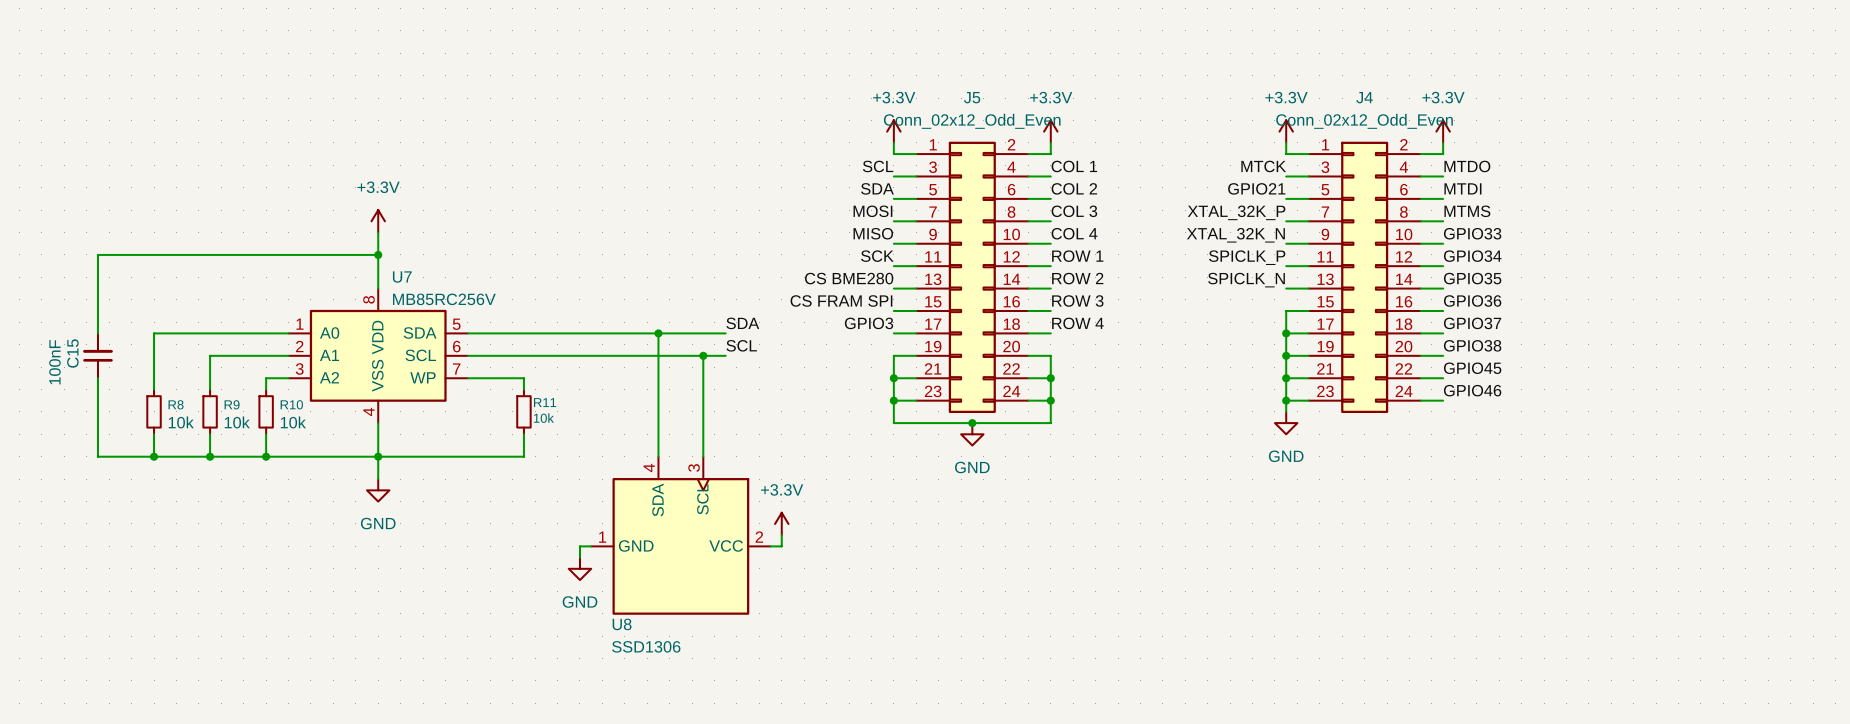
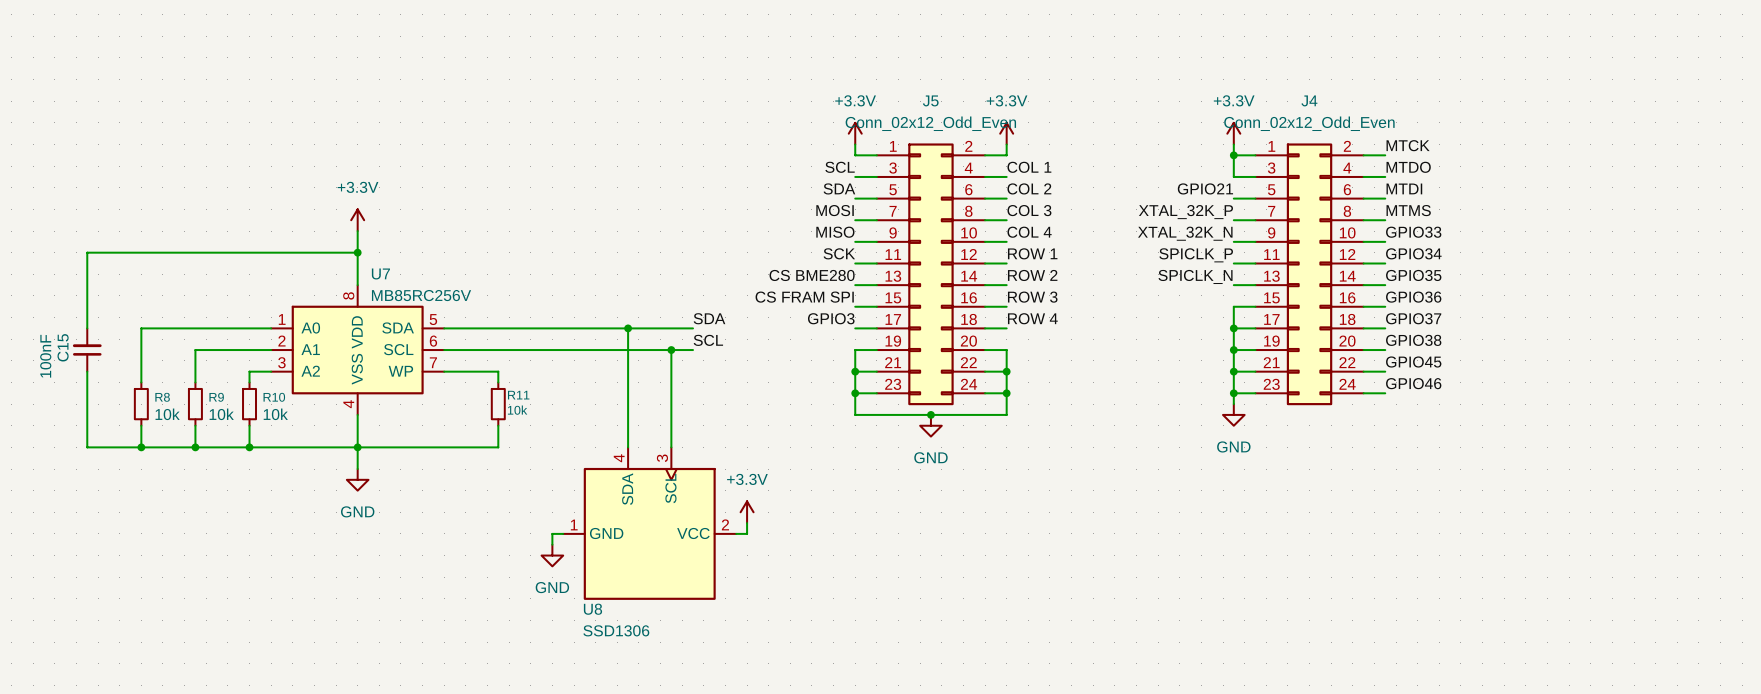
power symbol: +3.3V (1443, 131) -> none
wire: (1443, 142) (1443, 154) -> none
wire: none -> (1233, 155) (1233, 176)
junction: none -> (1233, 155)
label position: MTCK (1263, 166) -> MTCK (1408, 145)

